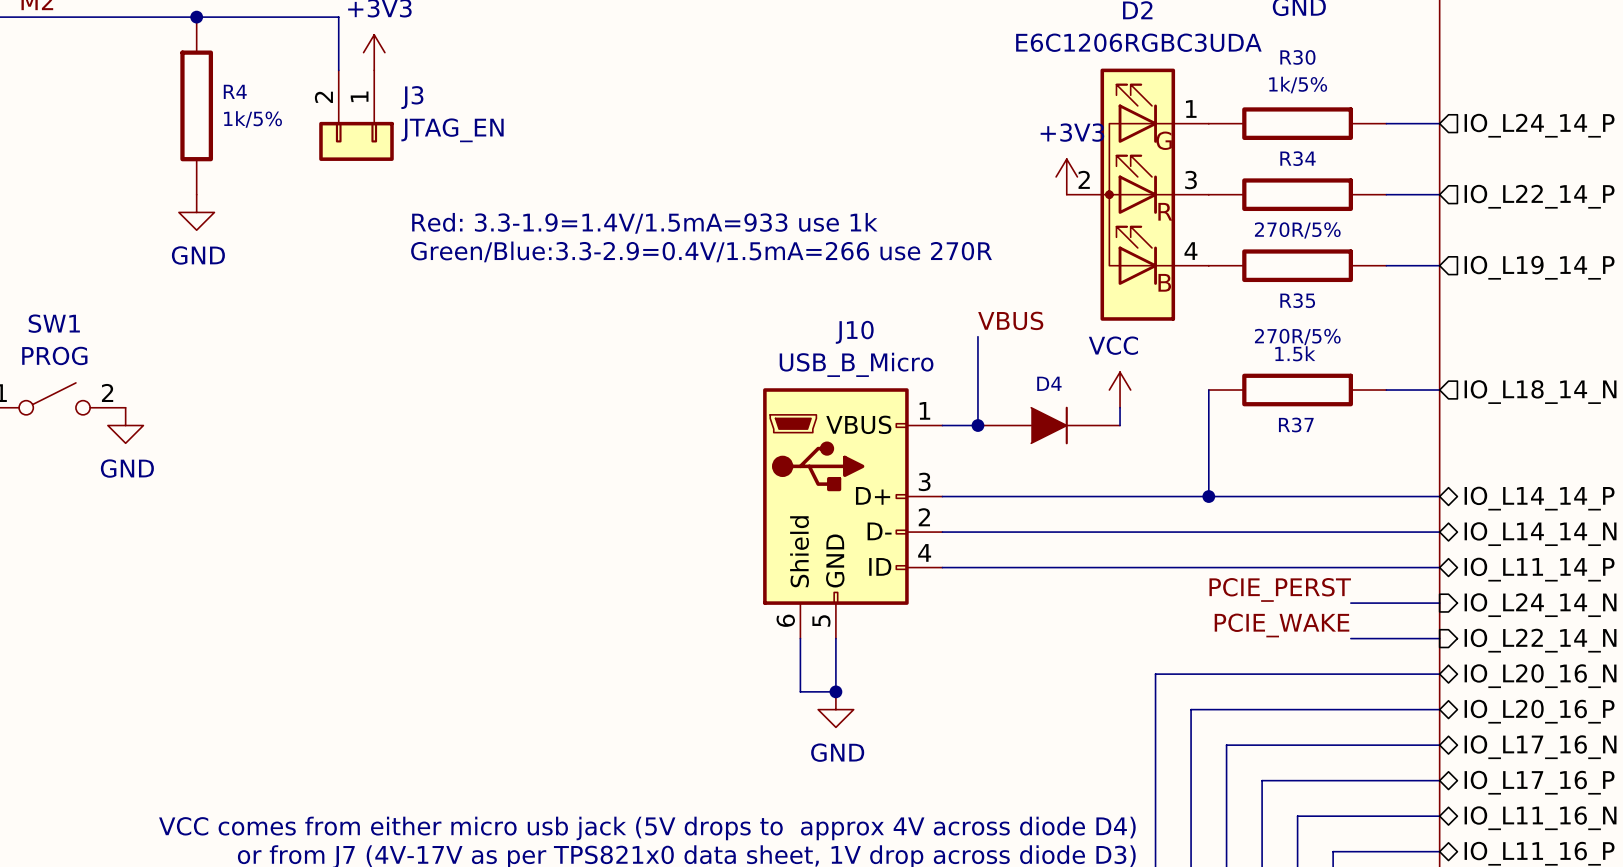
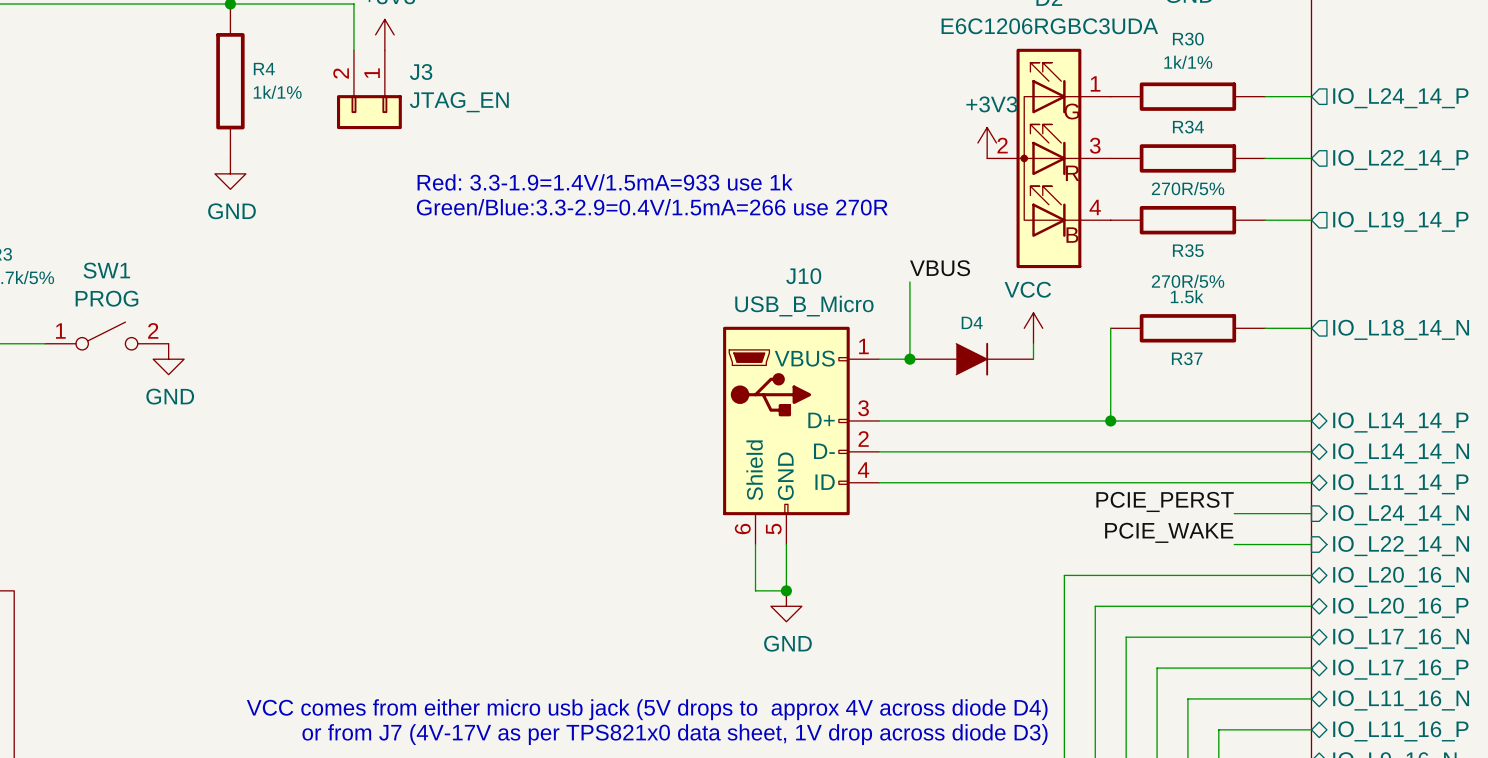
R30 value: 1k/5% (1298, 85) -> 1k/1% (1188, 62)
R4 value: 1k/5% (253, 119) -> 1k/1% (277, 92)

